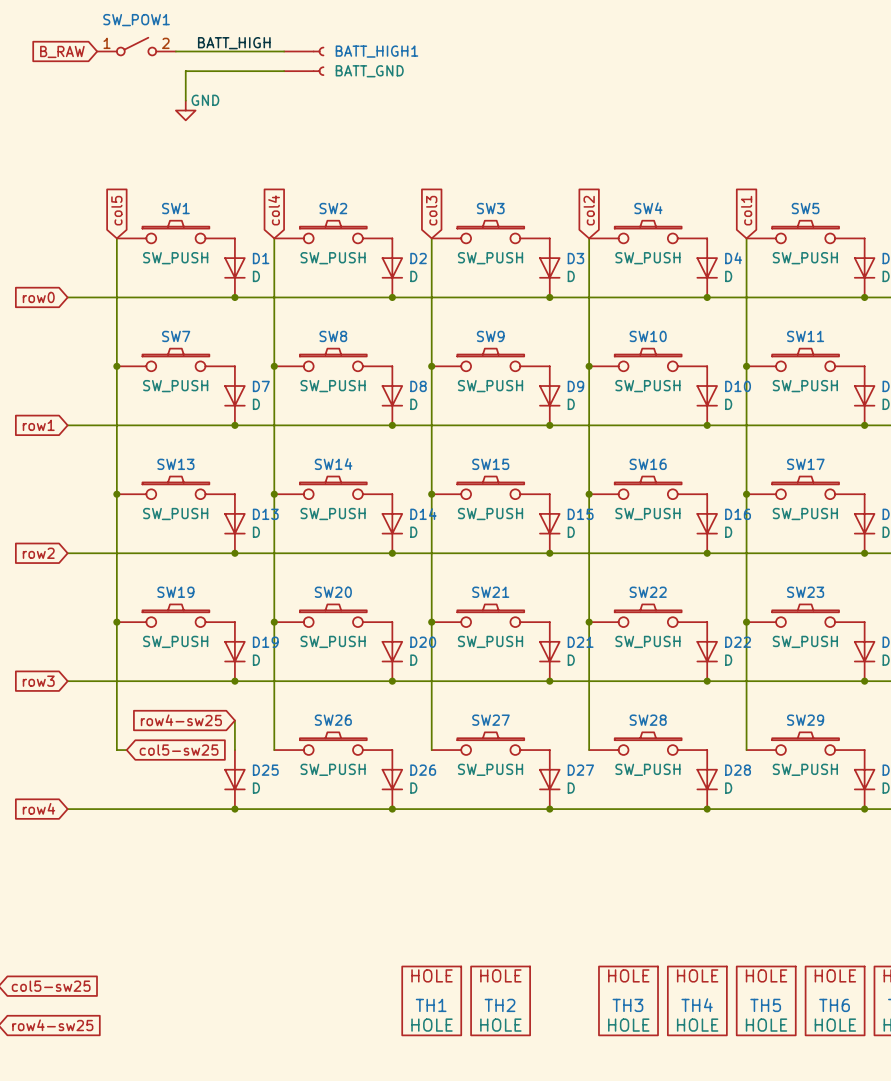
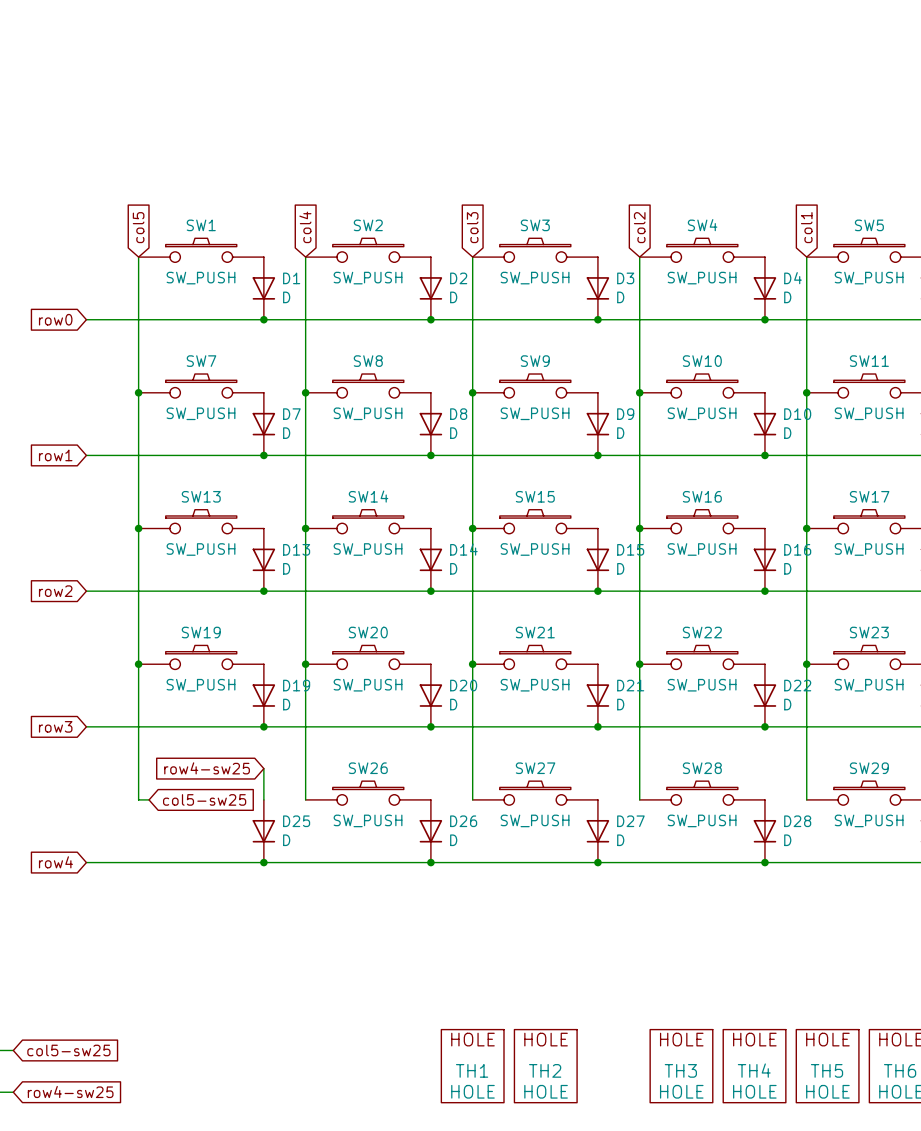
label: BATT_HIGH (234, 43) -> none
SW_POW1: (136, 46) -> none
global label: B_RAW (62, 51) -> none
wire: (175, 51) (284, 51) -> none
BATT_HIGH1: BATT_GND (304, 61) -> none
wire: (284, 71) (185, 71) (185, 100) -> none
power symbol: GND (185, 110) -> none

